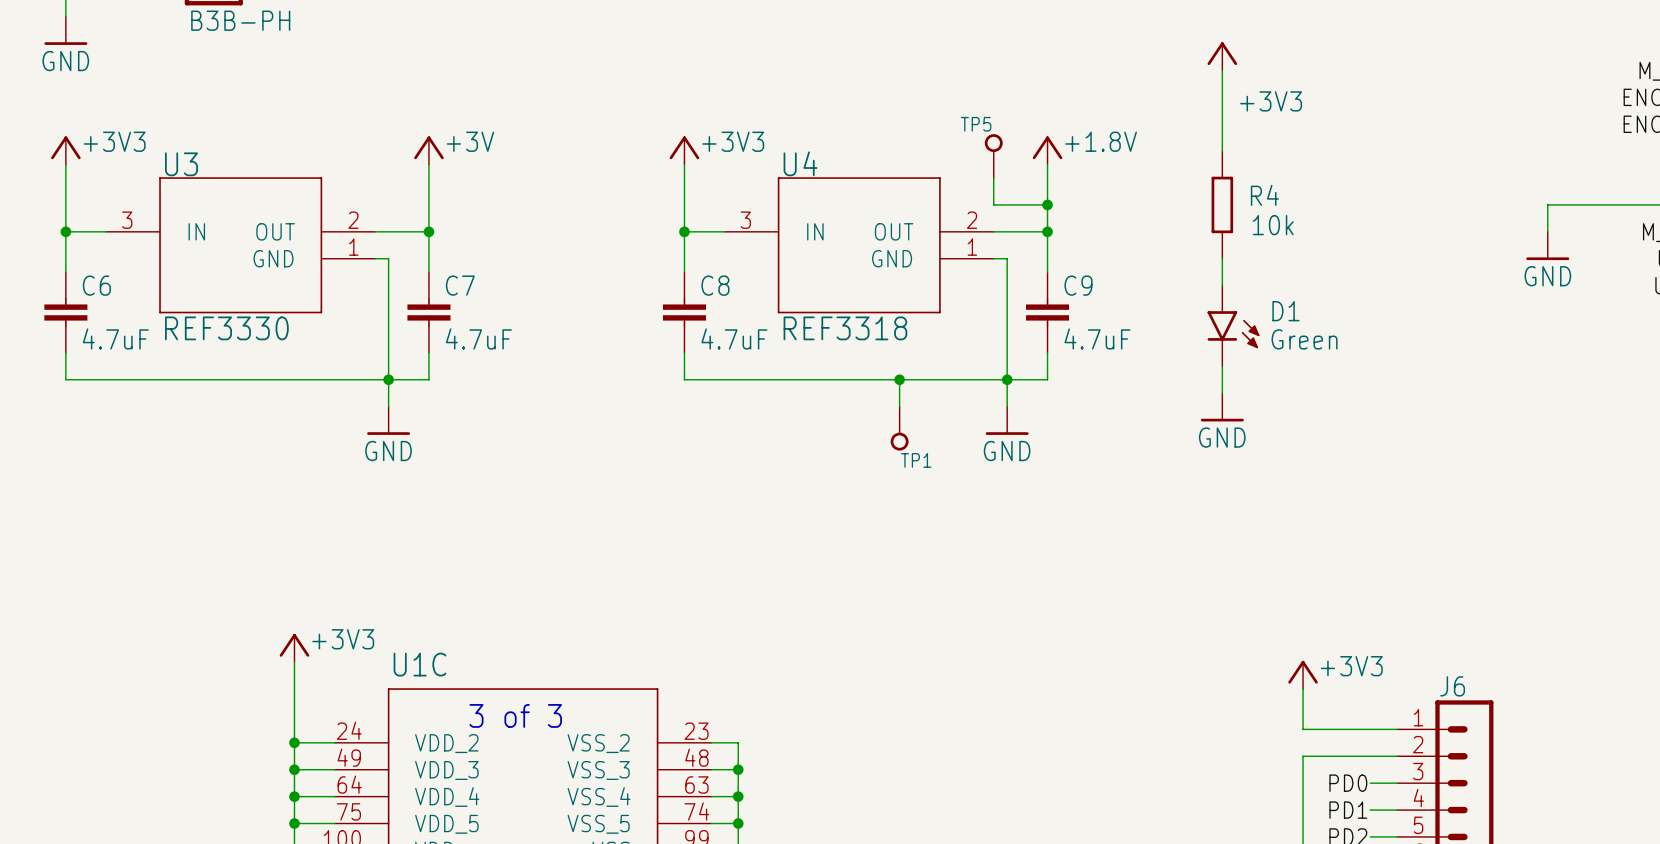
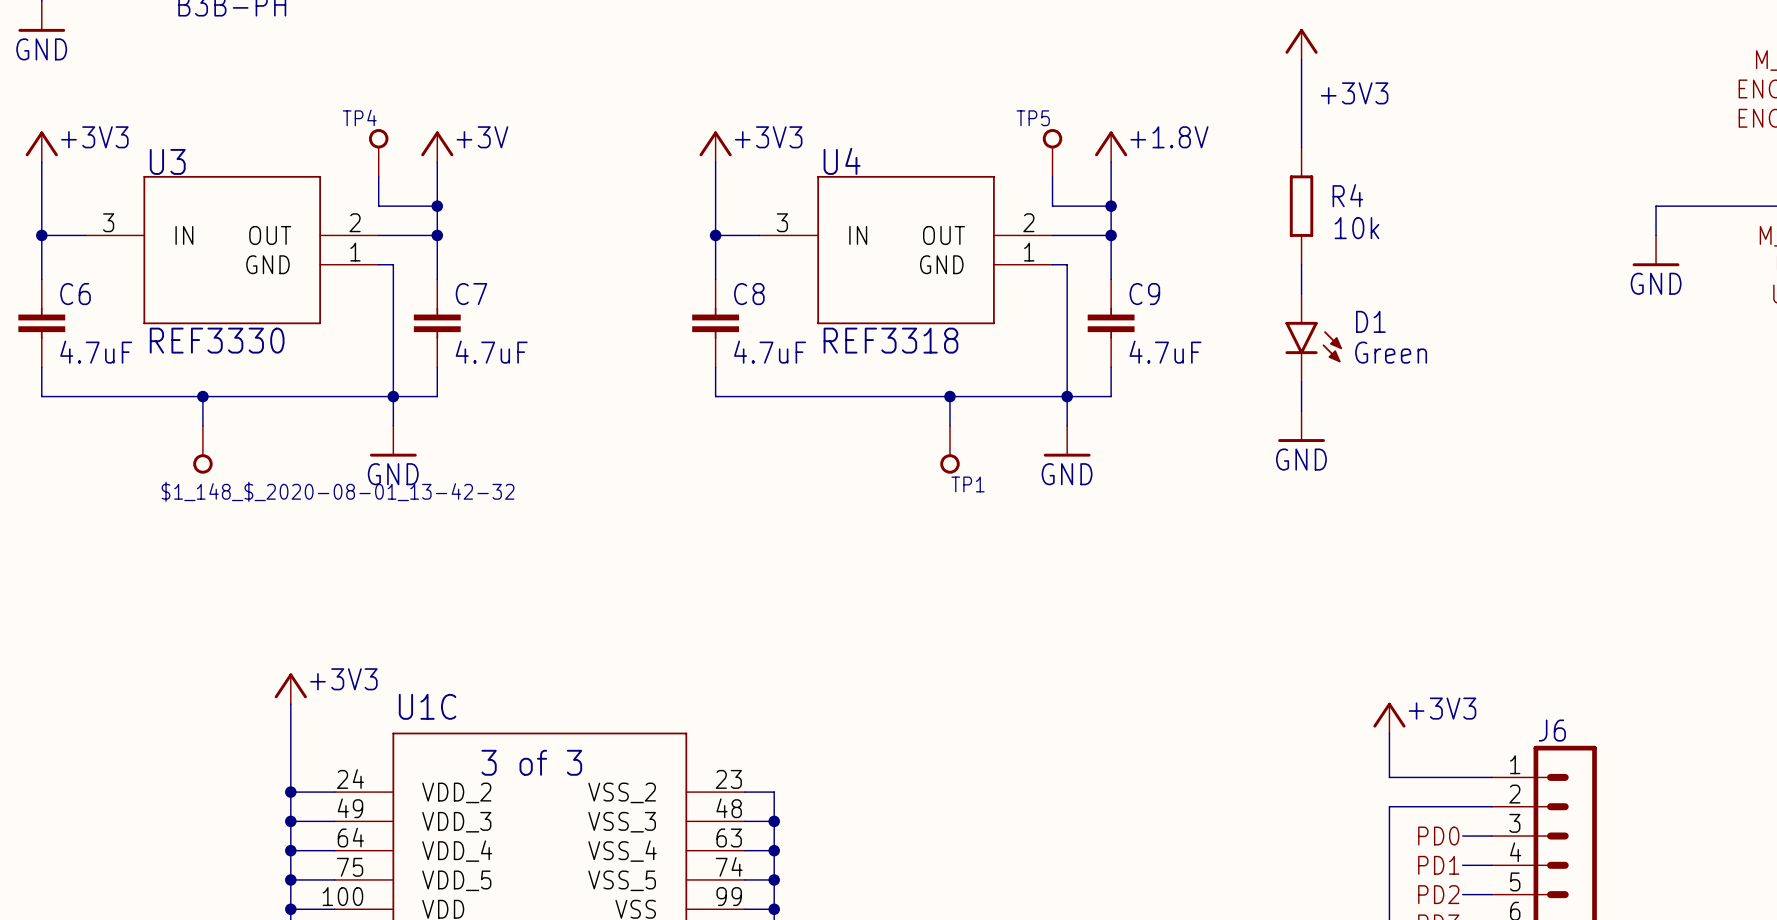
TP4: none -> (378, 152)
wire: none -> (378, 176) (378, 206) (437, 206)
junction: none -> (437, 206)
wire: none -> (202, 396) (202, 425)
junction: none -> (202, 396)
$1_148_$_2020-08-01_13-42-32: none -> (202, 449)

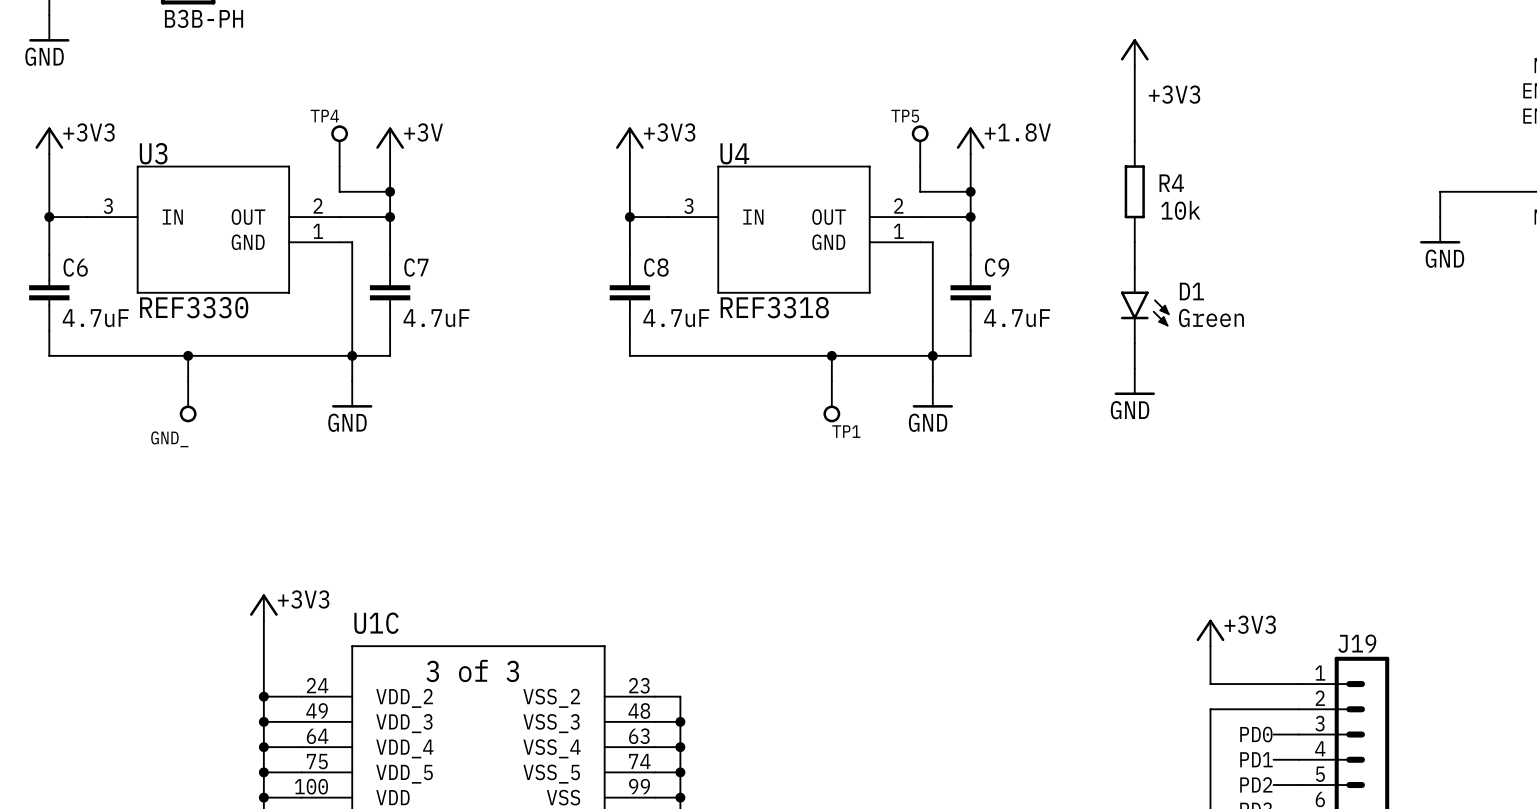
$1_148_$_2020-08-01_13-42-32 name: $1_148_$_2020-08-01_13-42-32 (338, 491) -> GND_ (169, 439)
J6 name: J6 (1552, 730) -> J19 (1357, 643)

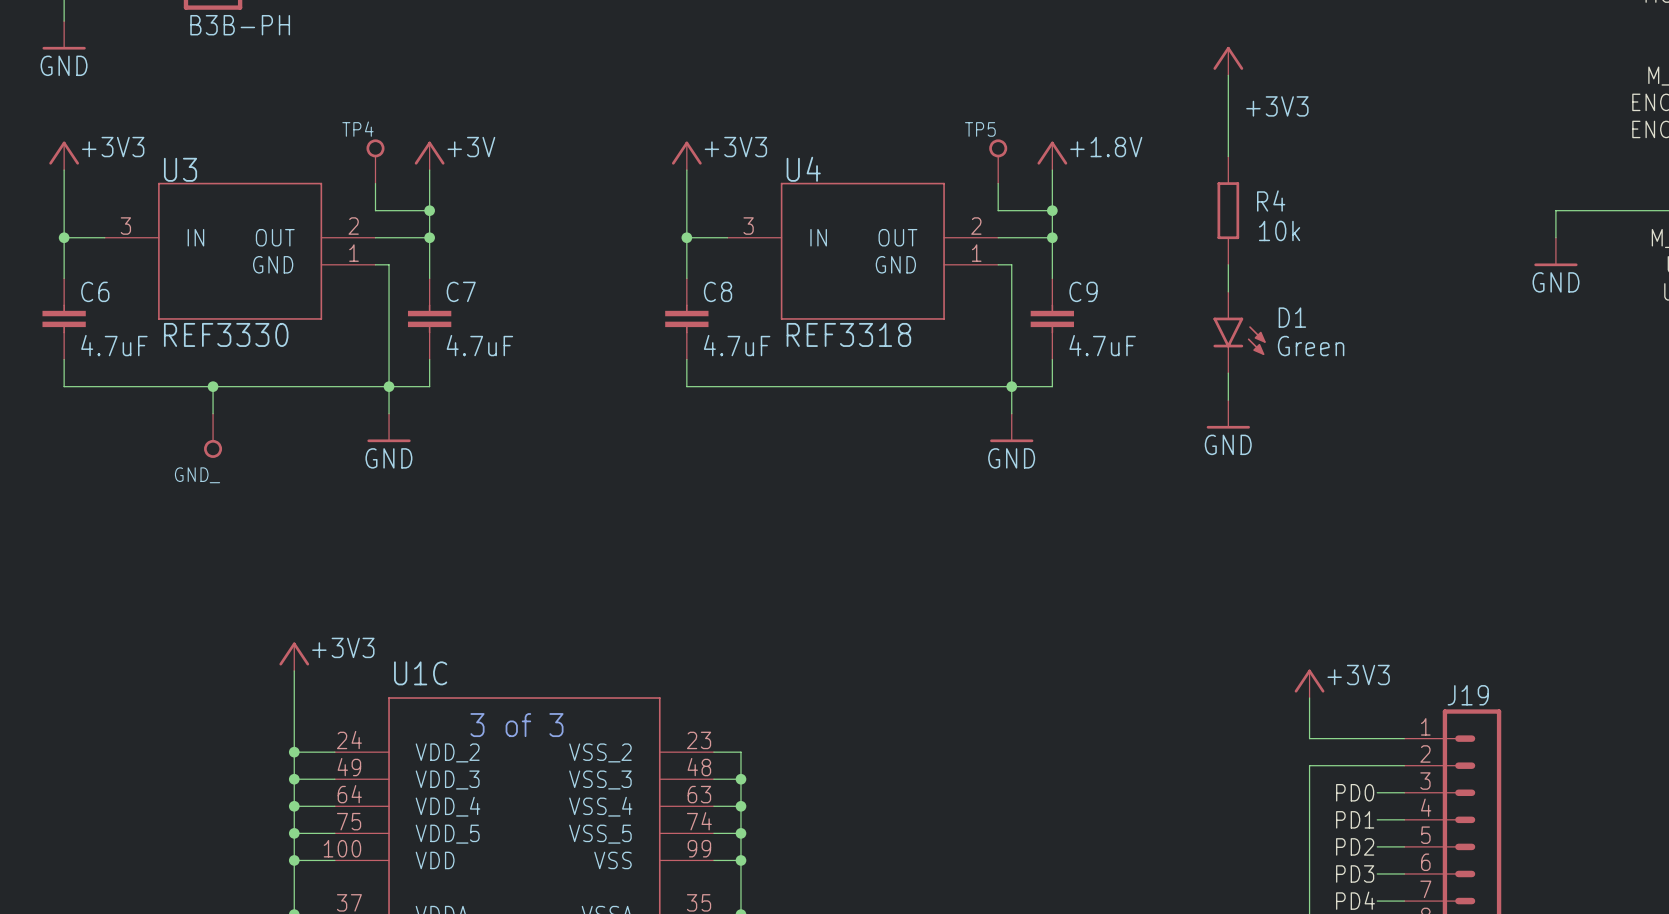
wire: (831, 355) (831, 381) -> none
junction: (831, 355) -> none
TP1: (831, 401) -> none

